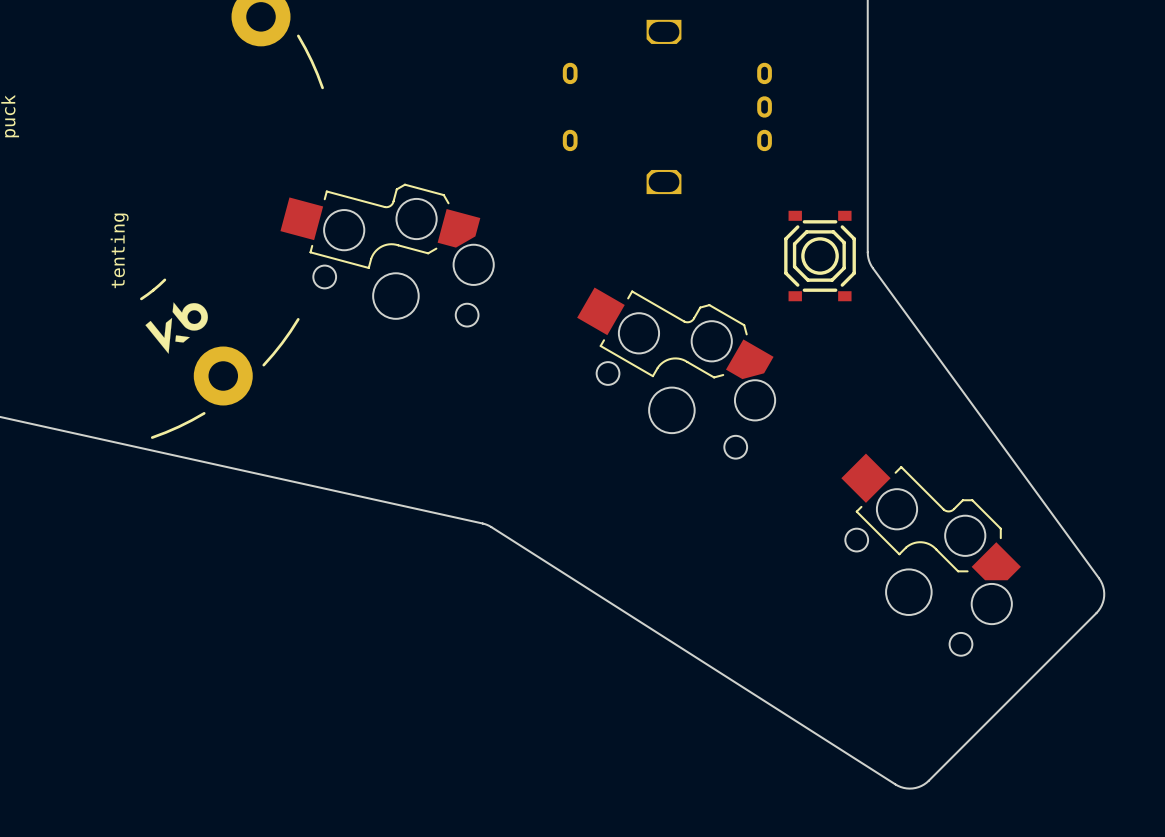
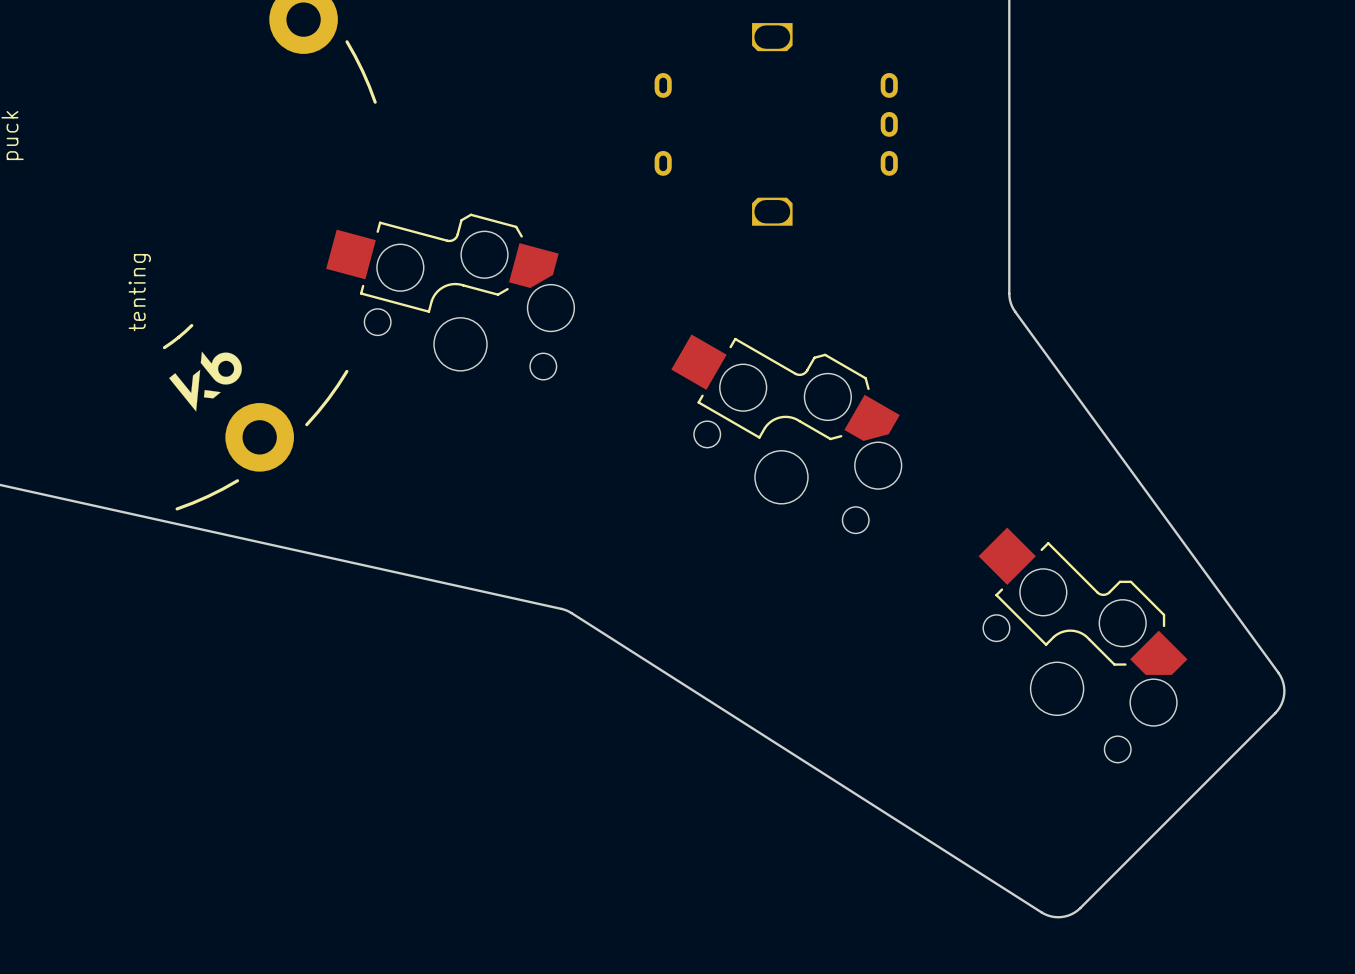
part: (820, 256) -> none

